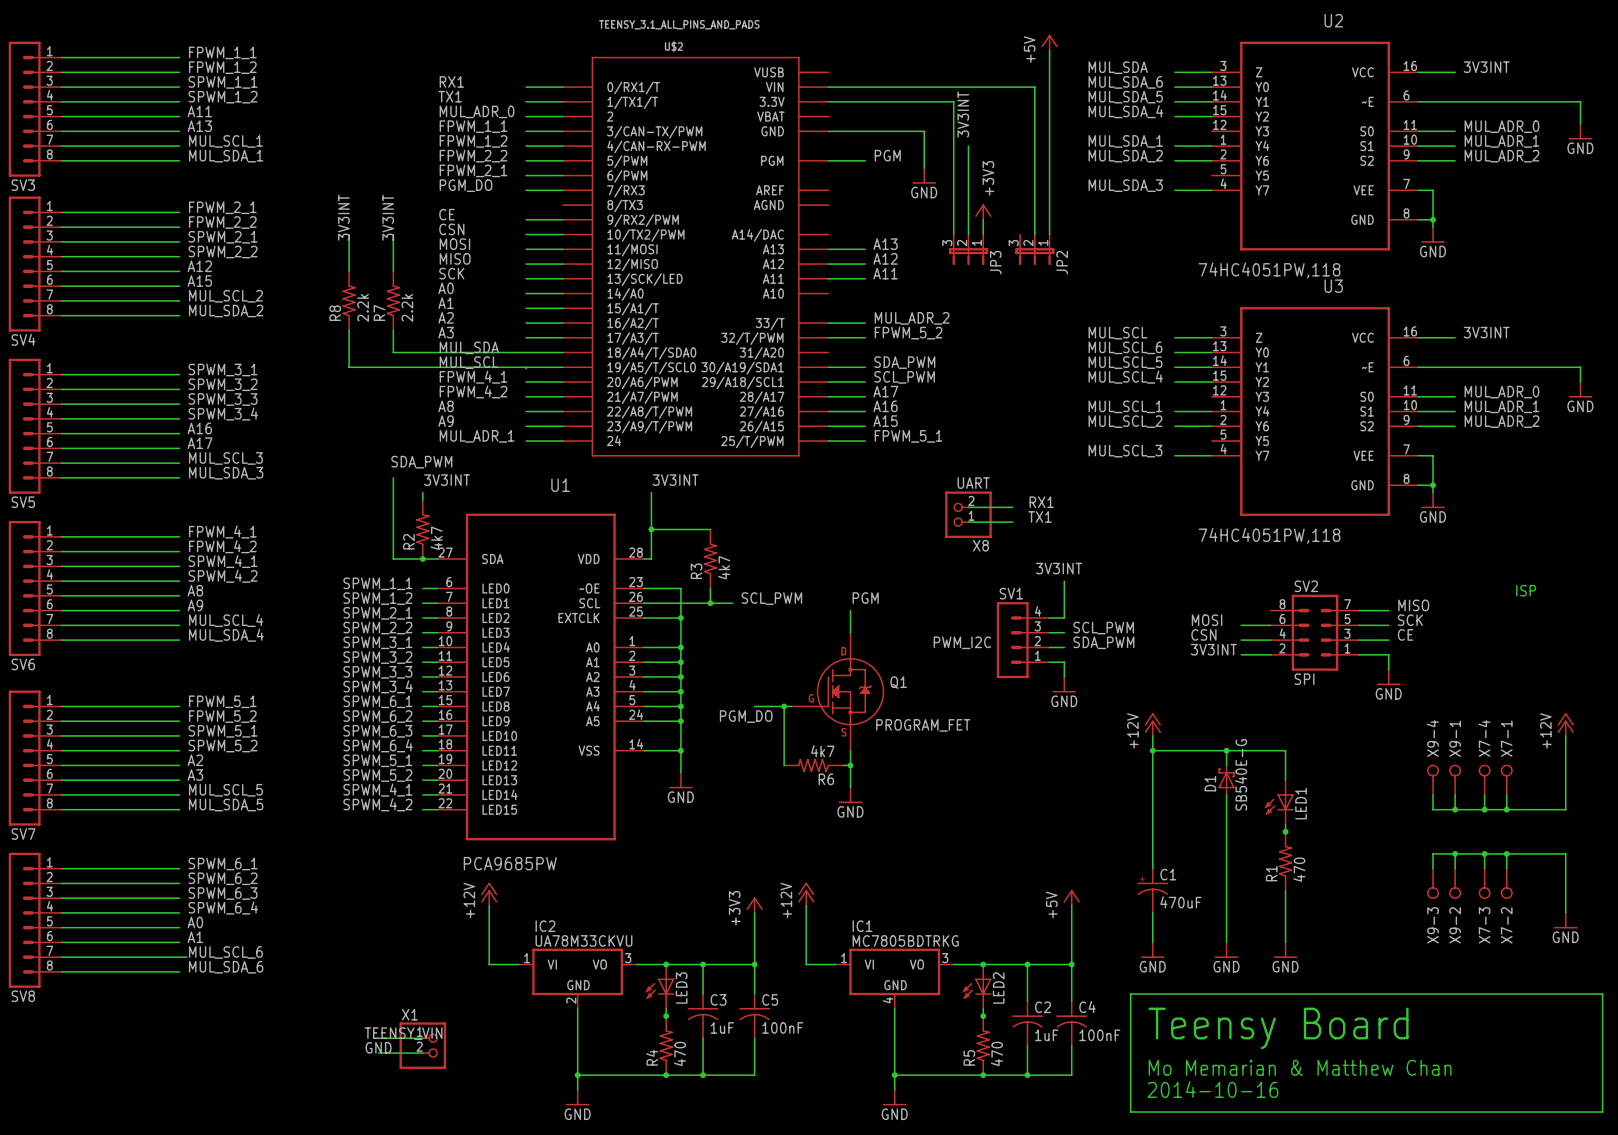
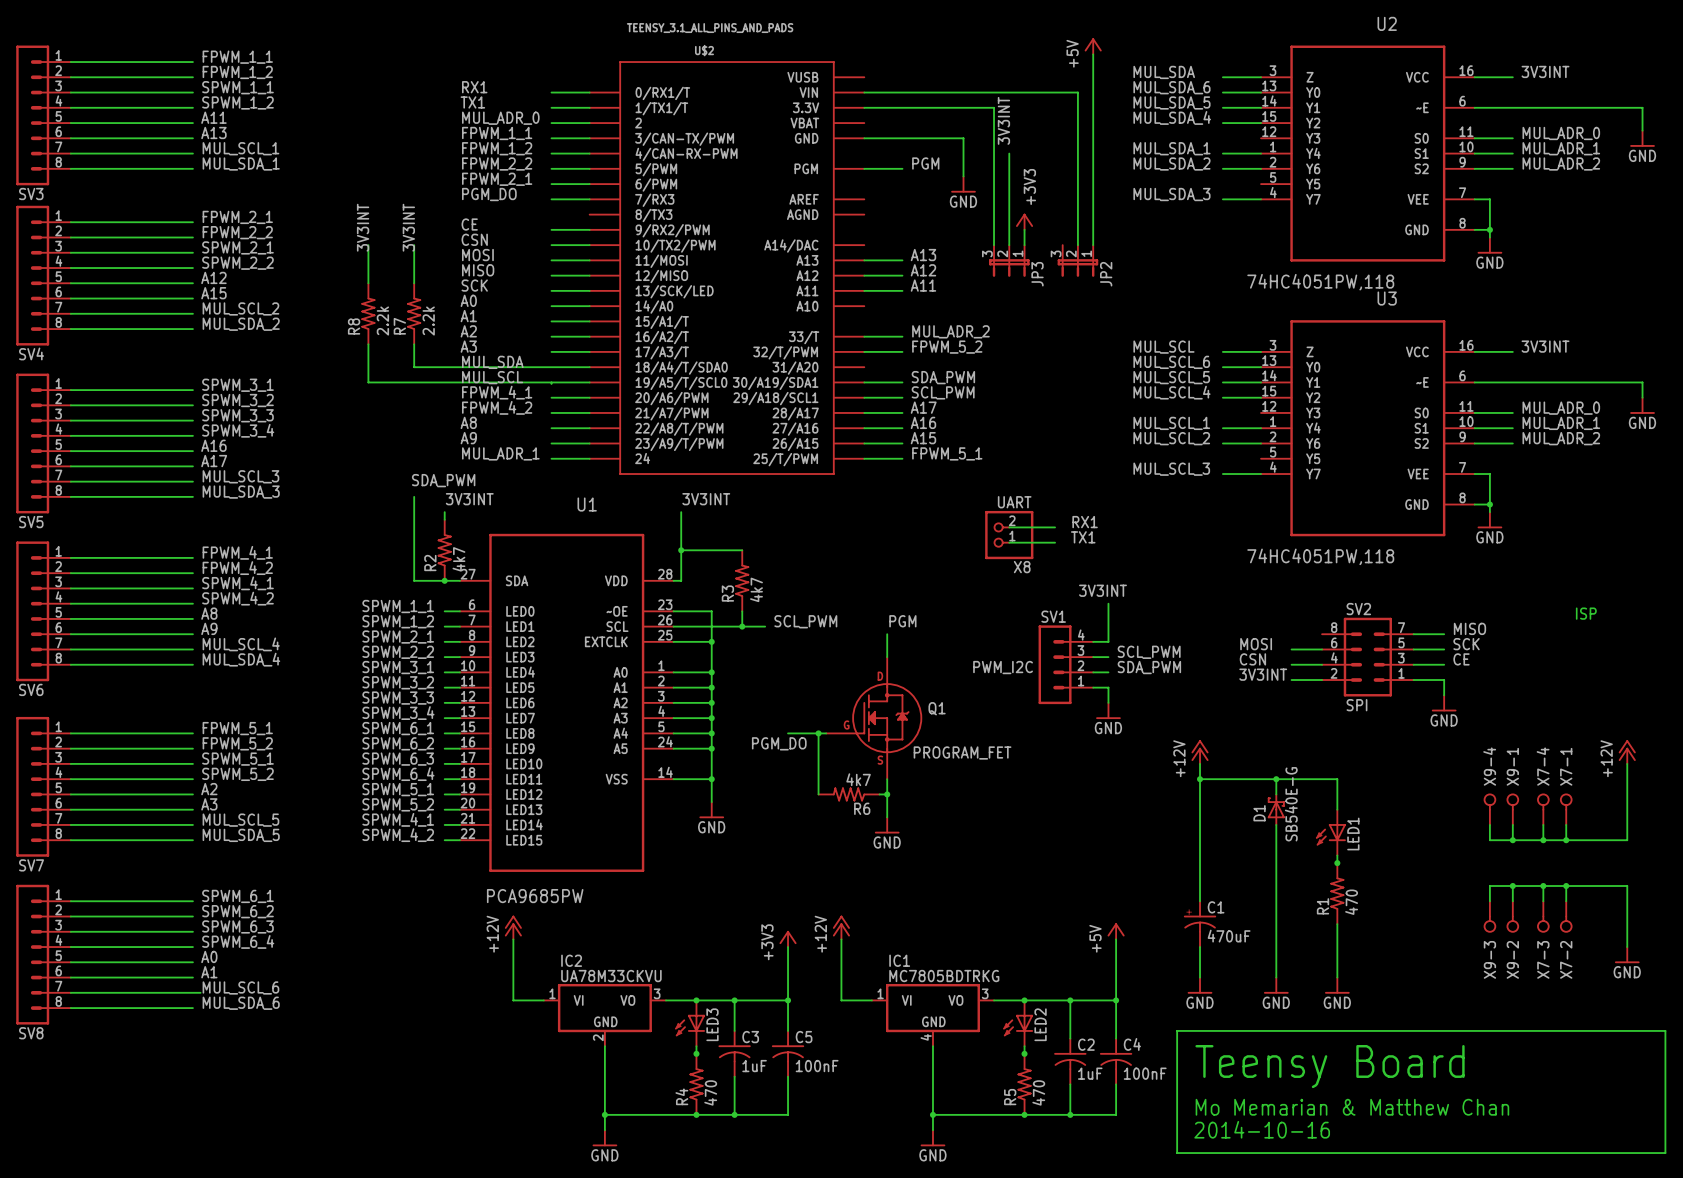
label: TEENSY_VIN (403, 1033) -> none
wire: (378, 1038) (422, 1038) -> none
X1: (422, 1045) -> none
label: GND (378, 1047) -> none
wire: (378, 1053) (422, 1053) -> none

